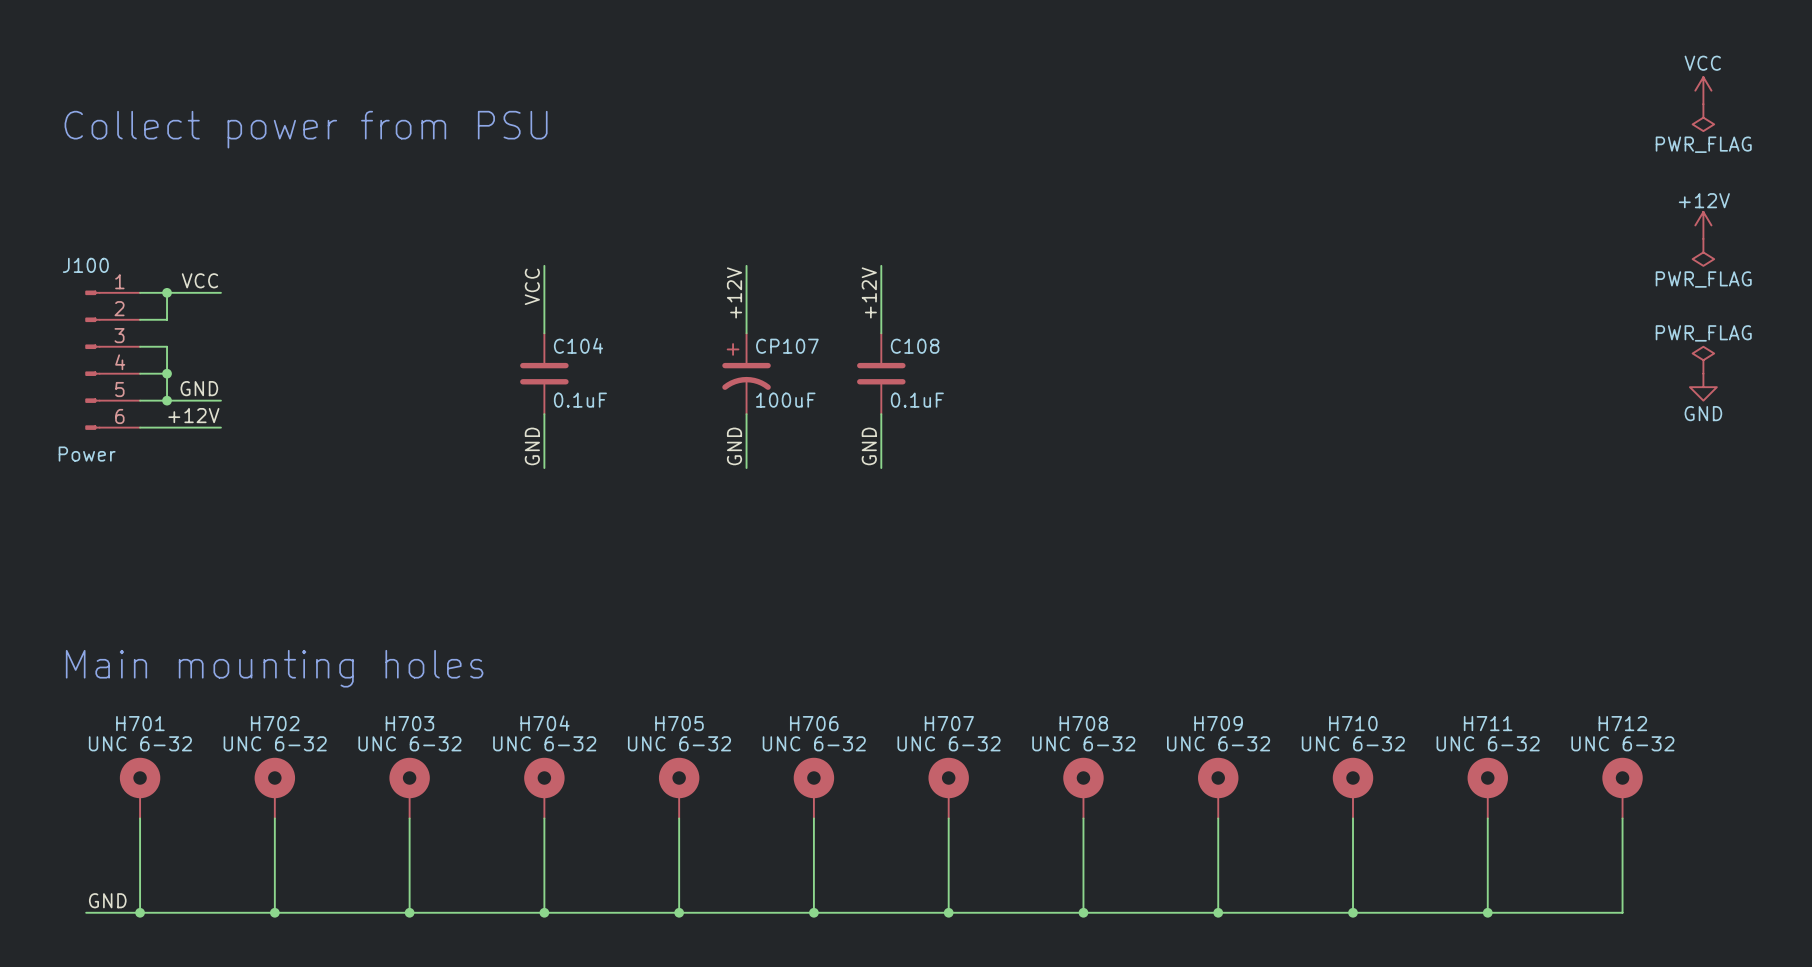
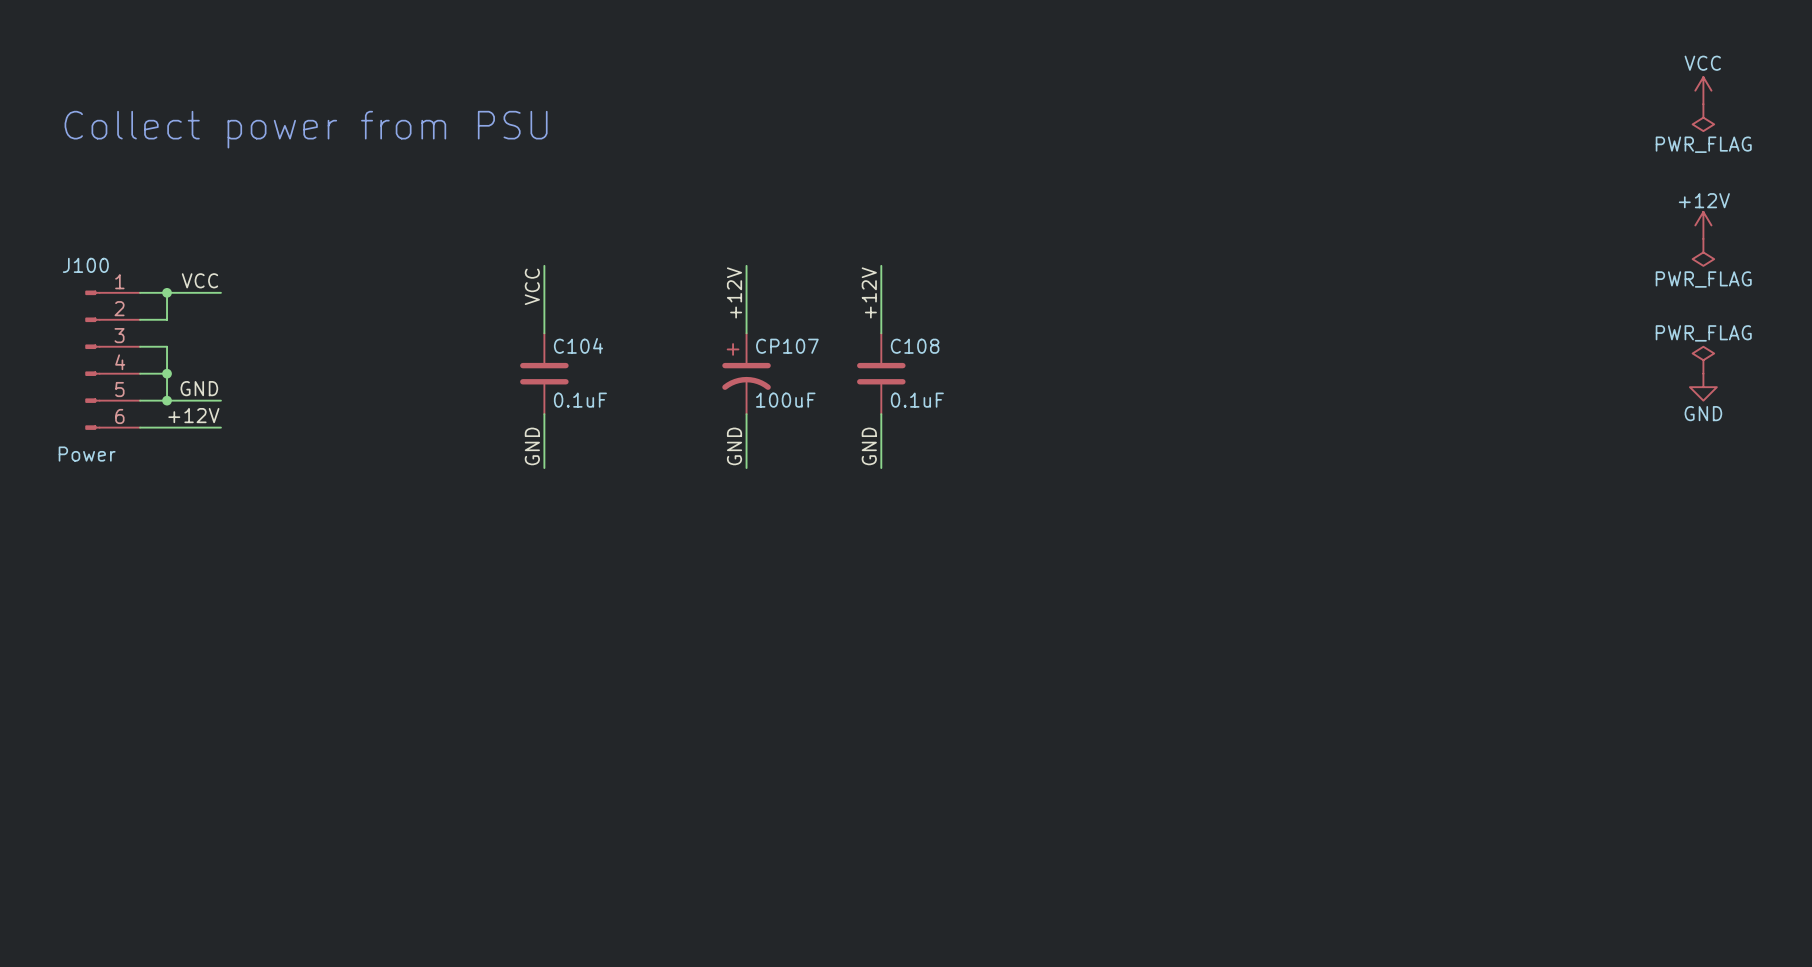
text: Main mounting holes (274, 668) -> none
H701: UNC 6-32 (140, 788) -> none
H702: UNC 6-32 (274, 788) -> none
H703: UNC 6-32 (409, 788) -> none
H704: UNC 6-32 (544, 788) -> none
H705: UNC 6-32 (679, 788) -> none
H706: UNC 6-32 (813, 788) -> none
H707: UNC 6-32 (948, 788) -> none
H708: UNC 6-32 (1083, 788) -> none
H709: UNC 6-32 (1218, 788) -> none
H710: UNC 6-32 (1353, 788) -> none
H711: UNC 6-32 (1487, 788) -> none
H712: UNC 6-32 (1622, 788) -> none
wire: (140, 818) (140, 912) -> none
wire: (274, 818) (274, 912) -> none
wire: (409, 818) (409, 912) -> none
wire: (544, 818) (544, 912) -> none
wire: (679, 818) (679, 912) -> none
wire: (813, 818) (813, 912) -> none
wire: (948, 818) (948, 912) -> none
wire: (1083, 818) (1083, 912) -> none
wire: (1218, 818) (1218, 912) -> none
wire: (1353, 818) (1353, 912) -> none
wire: (1487, 818) (1487, 912) -> none
wire: (1622, 818) (1622, 912) (86, 912) -> none
label: GND (107, 900) -> none
junction: (140, 912) -> none
junction: (274, 912) -> none
junction: (409, 912) -> none
junction: (544, 912) -> none
junction: (679, 912) -> none
junction: (813, 912) -> none
junction: (948, 912) -> none
junction: (1083, 912) -> none
junction: (1218, 912) -> none
junction: (1353, 912) -> none
junction: (1487, 912) -> none

